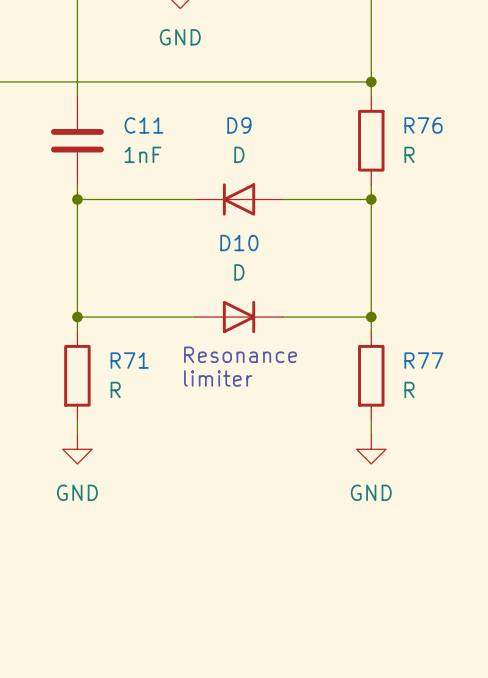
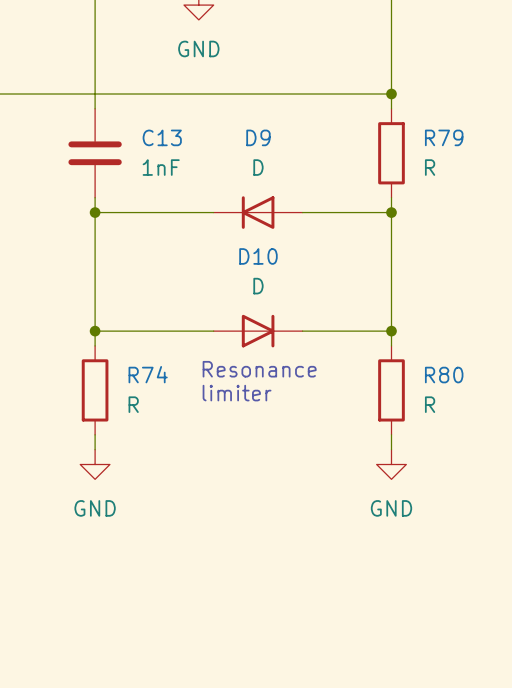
C11 name: C11 (143, 125) -> C13 (162, 137)
R76 name: R76 (423, 125) -> R79 (444, 137)
R71 name: R71 (129, 360) -> R74 (148, 374)
R77 name: R77 (423, 360) -> R80 (444, 375)

